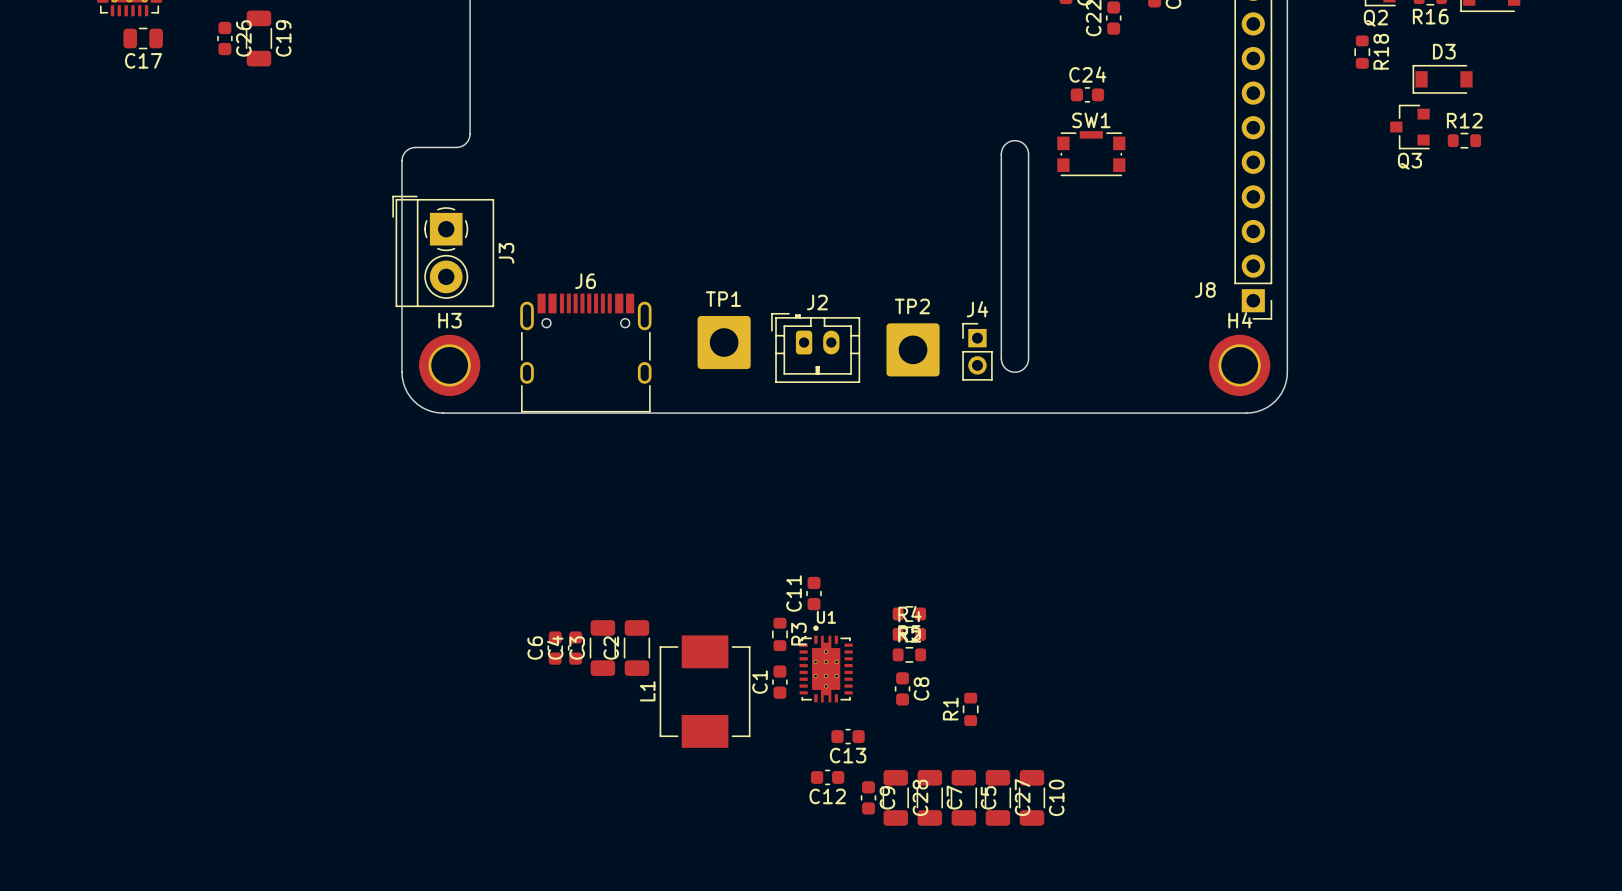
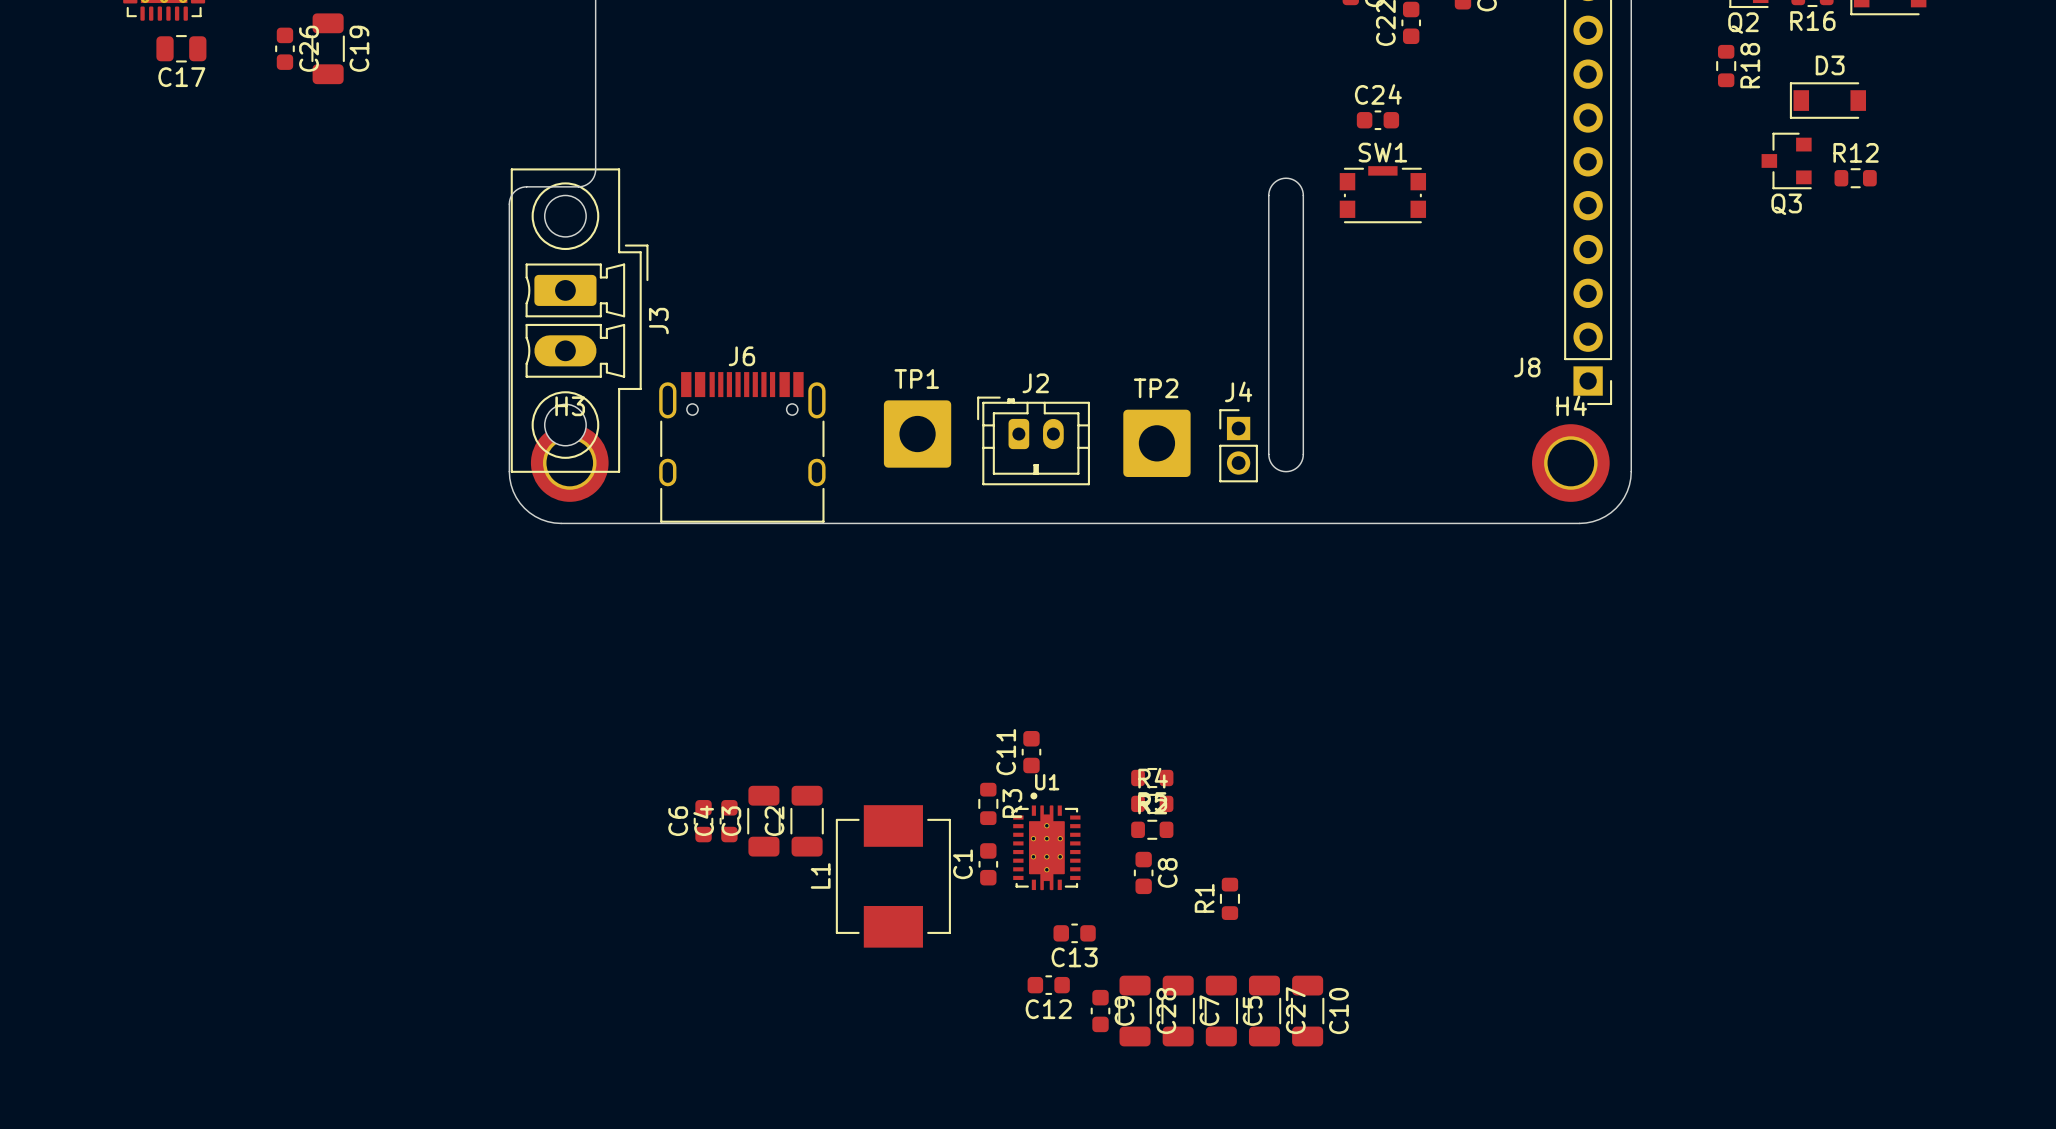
J3 footprint: [392, 195, 495, 308] -> [510, 168, 649, 473]

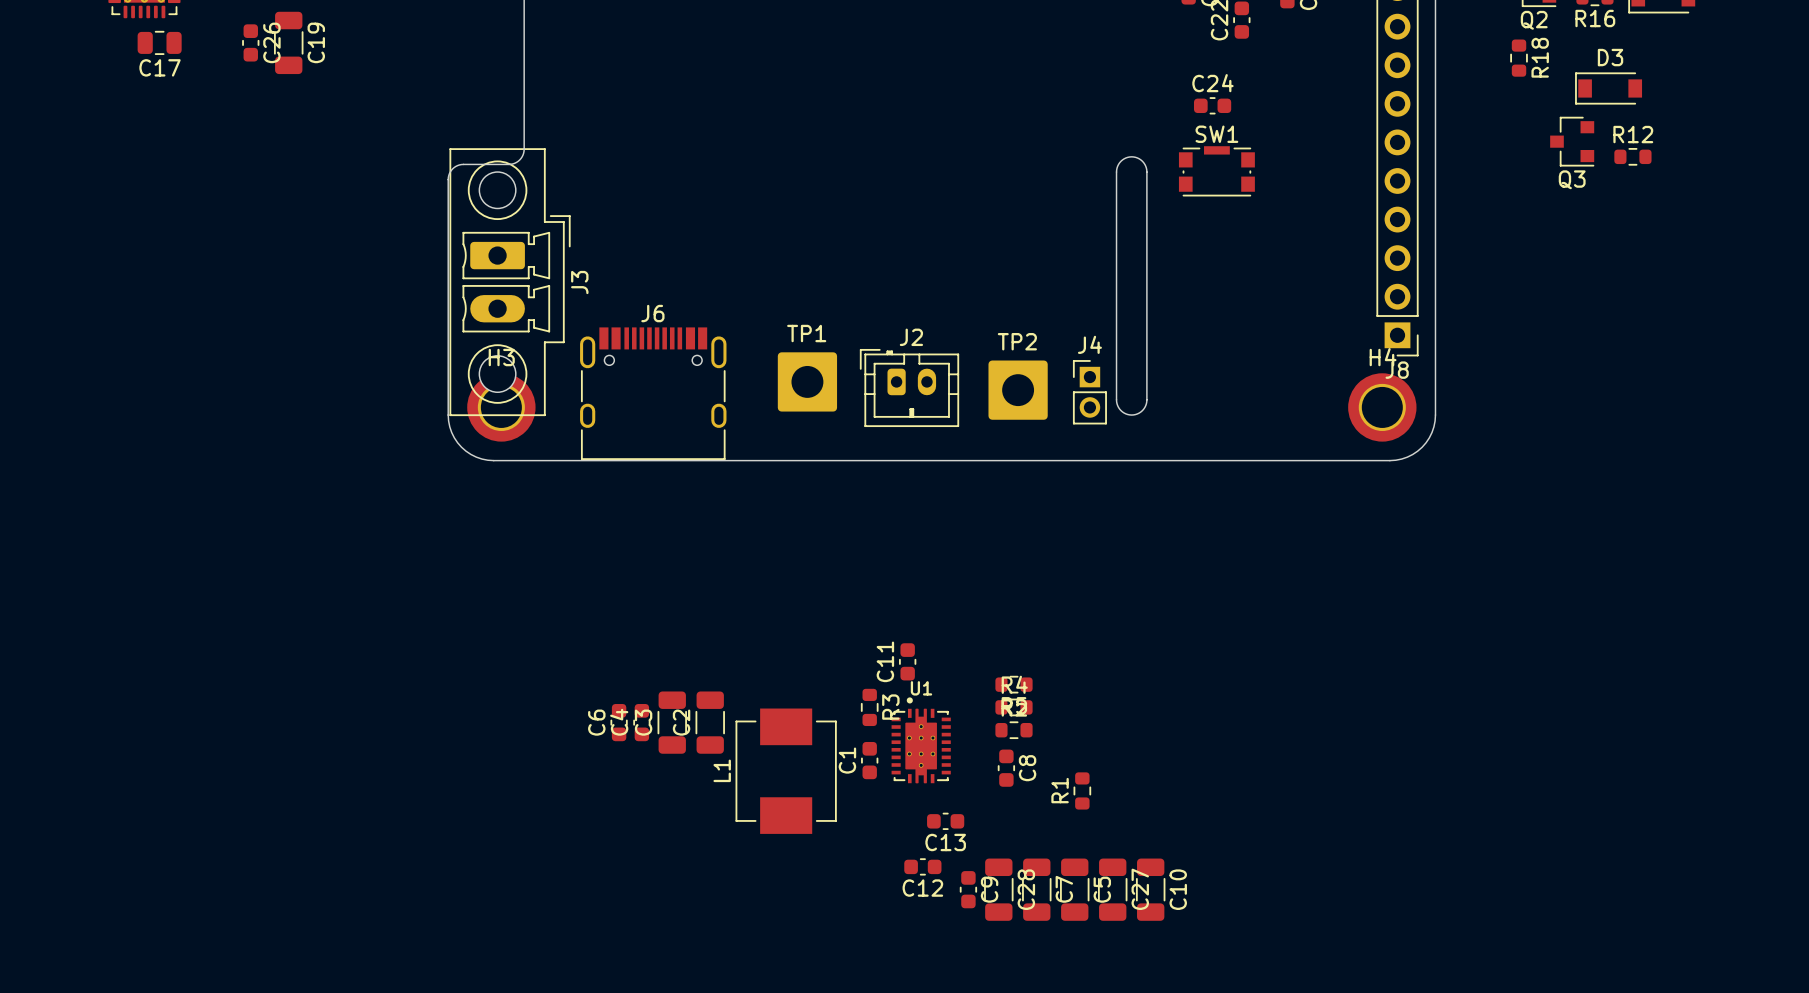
J8 name position: J8 (1527, 367) -> J8 (1397, 370)

